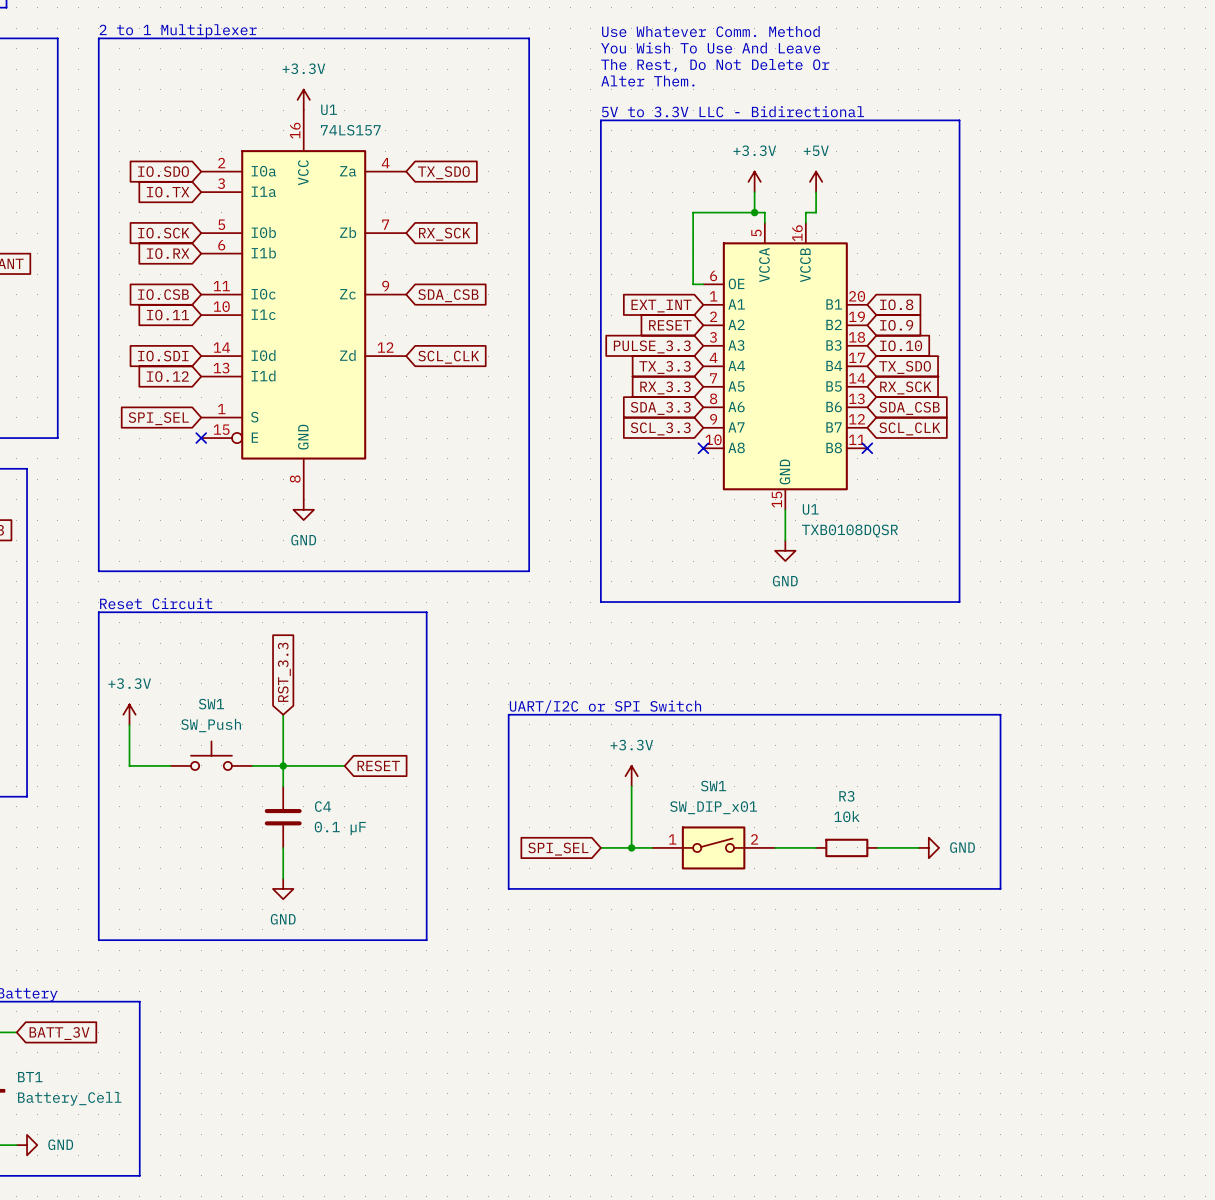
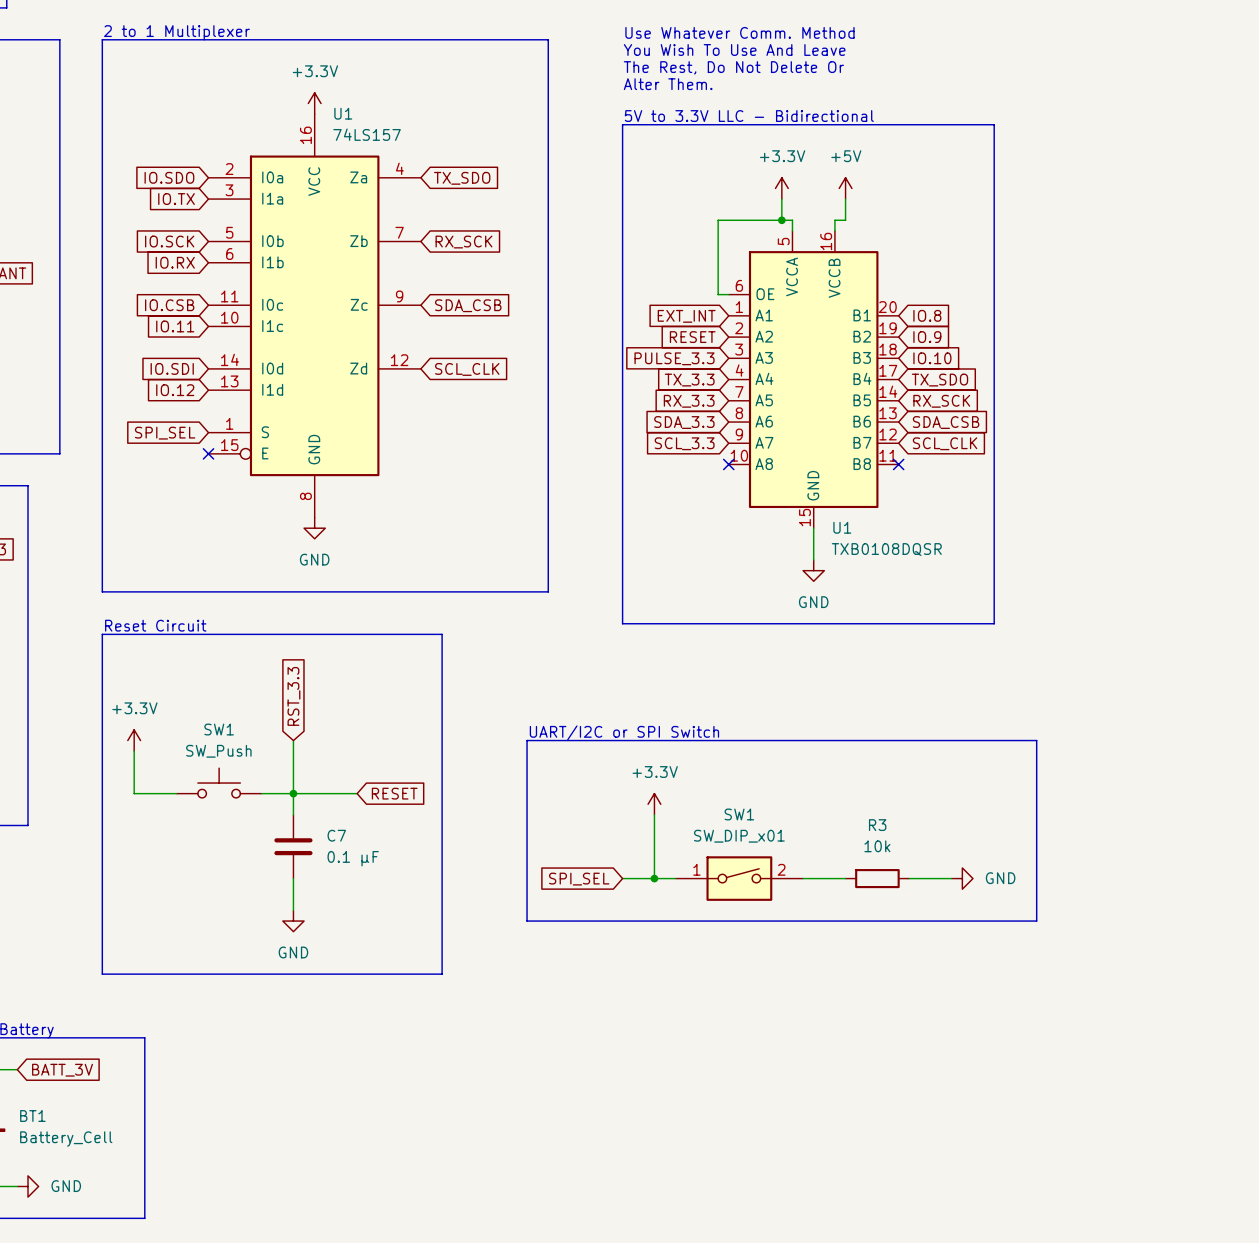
C4 name: C4 (323, 806) -> C7 (336, 835)

